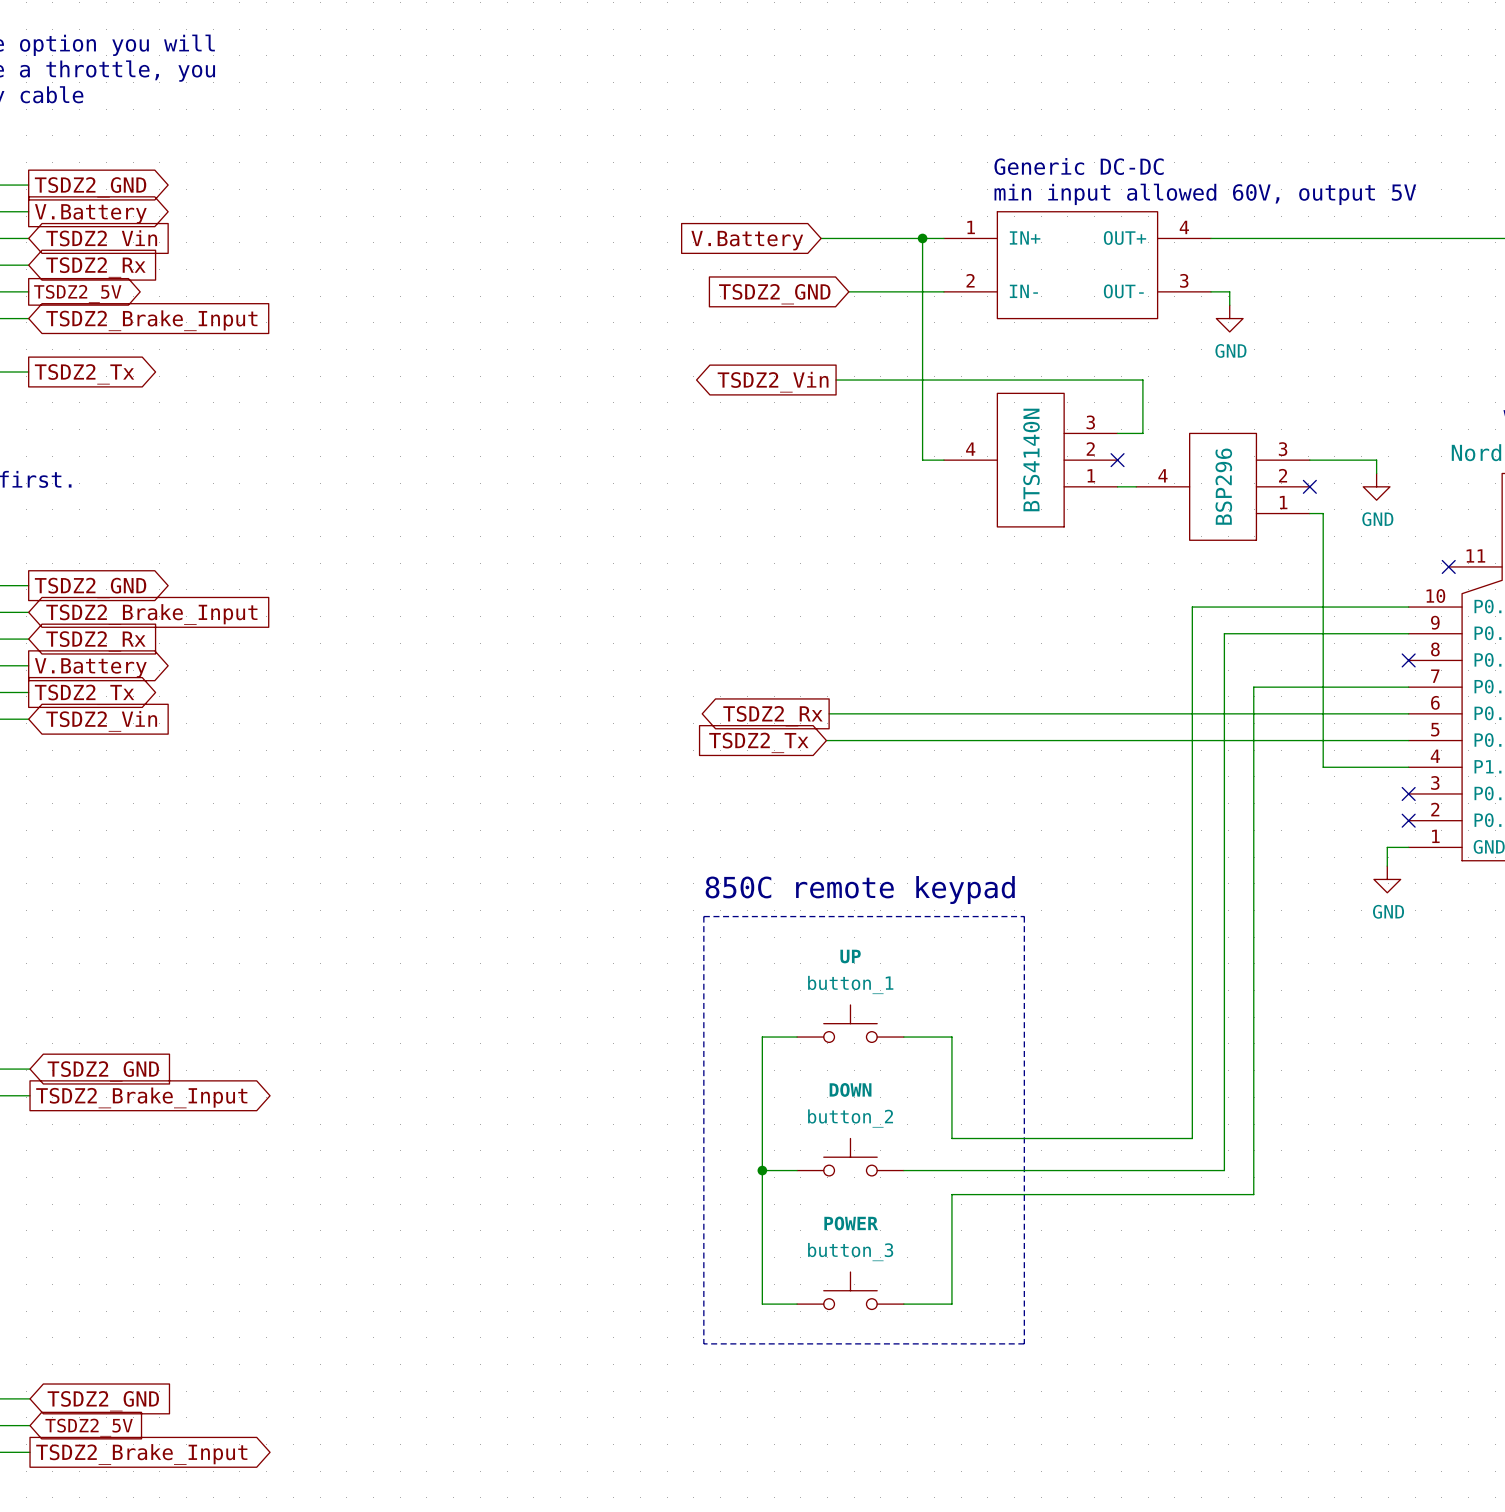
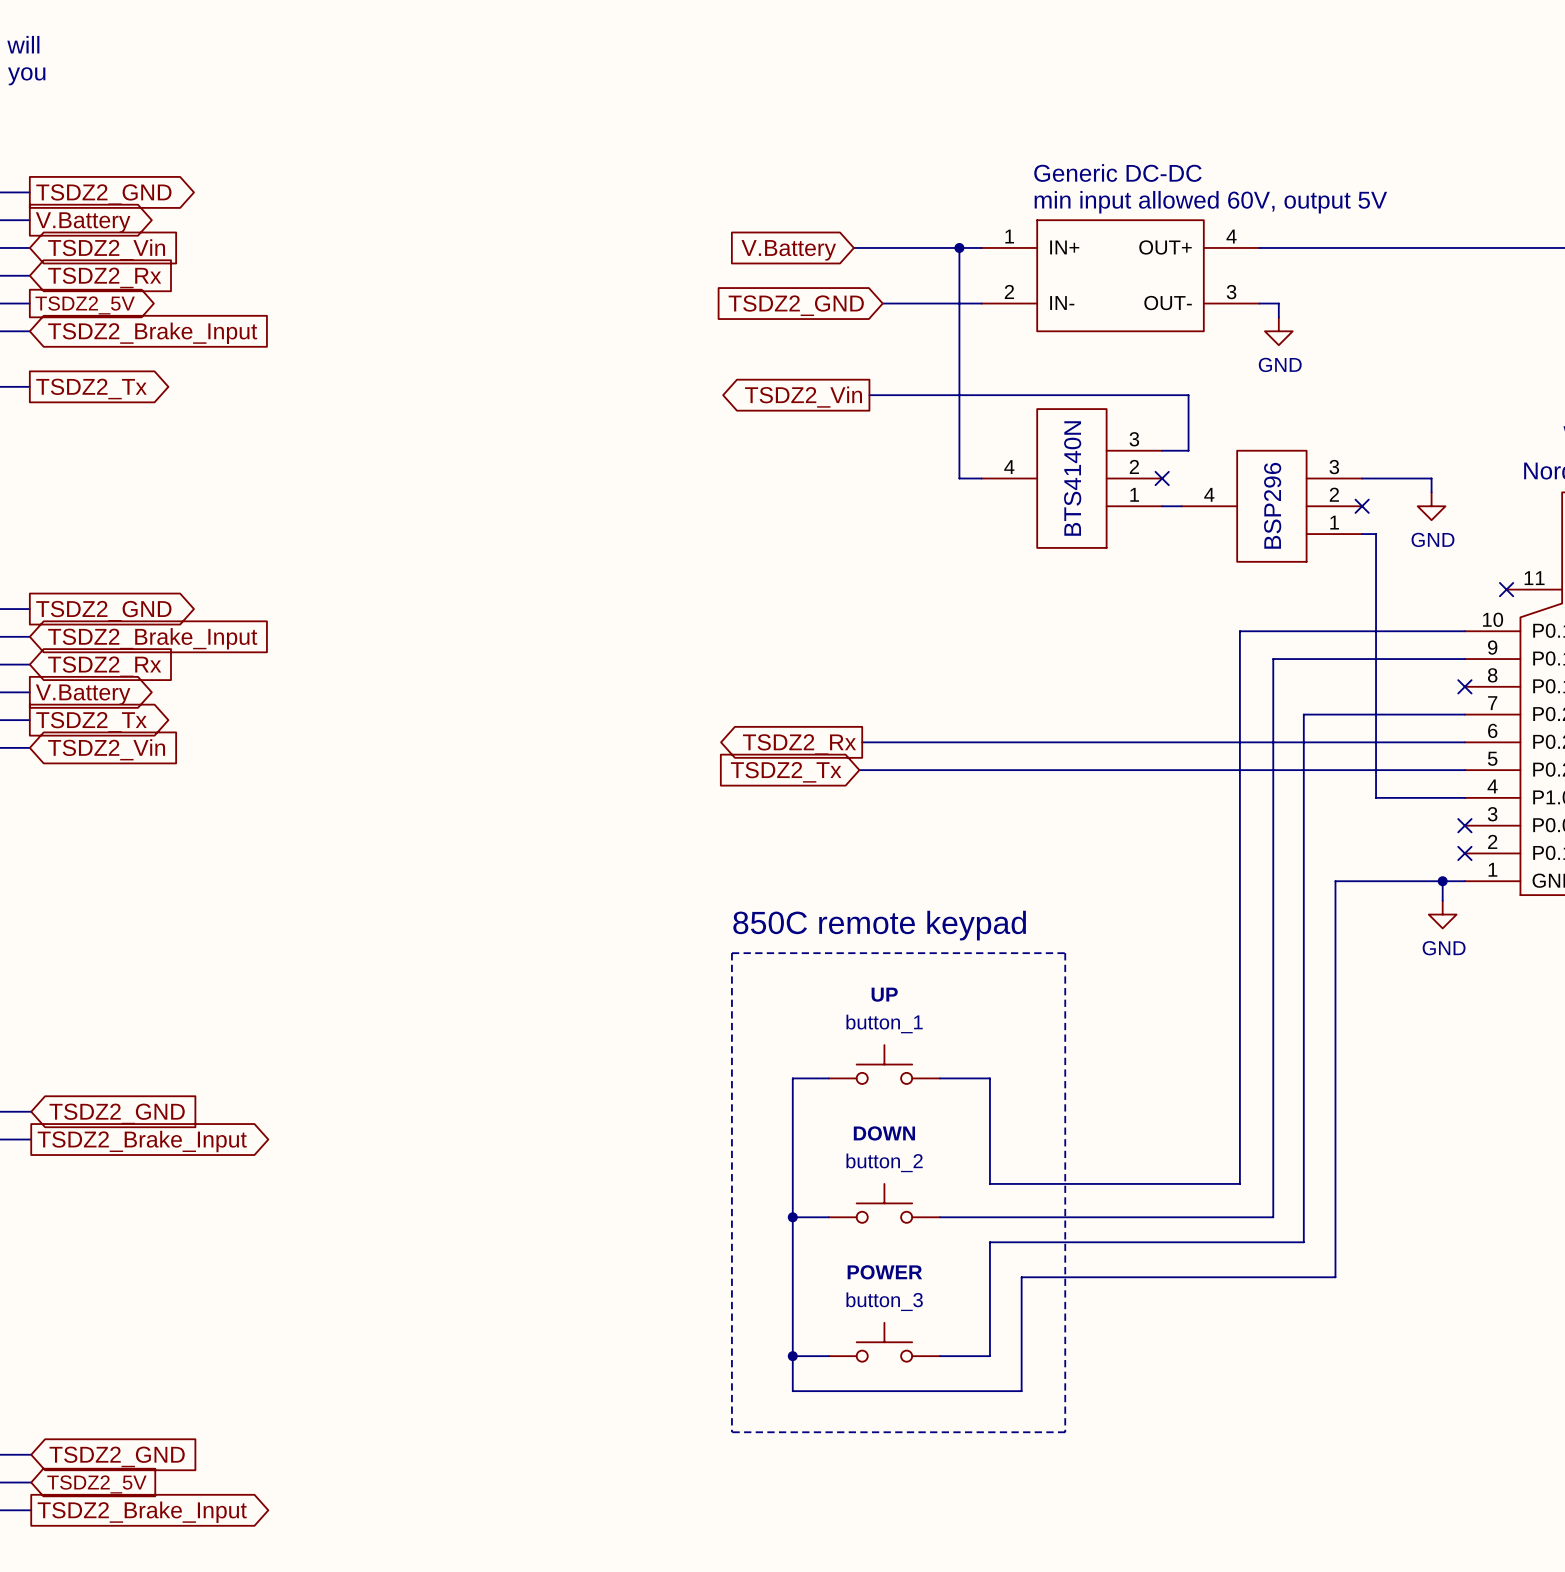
wire: none -> (1442, 881) (1335, 881) (1335, 1277) (1021, 1277) (1021, 1391) (792, 1391) (792, 1356)
junction: none -> (1442, 881)
junction: none -> (792, 1356)
line: (703, 1343) (1024, 1343) -> (731, 1397) (731, 1432) (1065, 1432) (1065, 1397)

